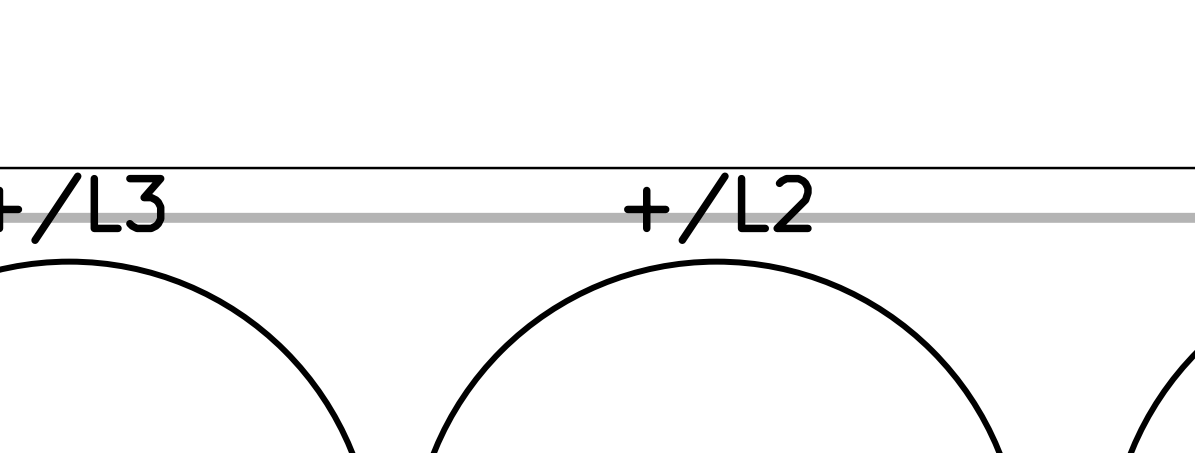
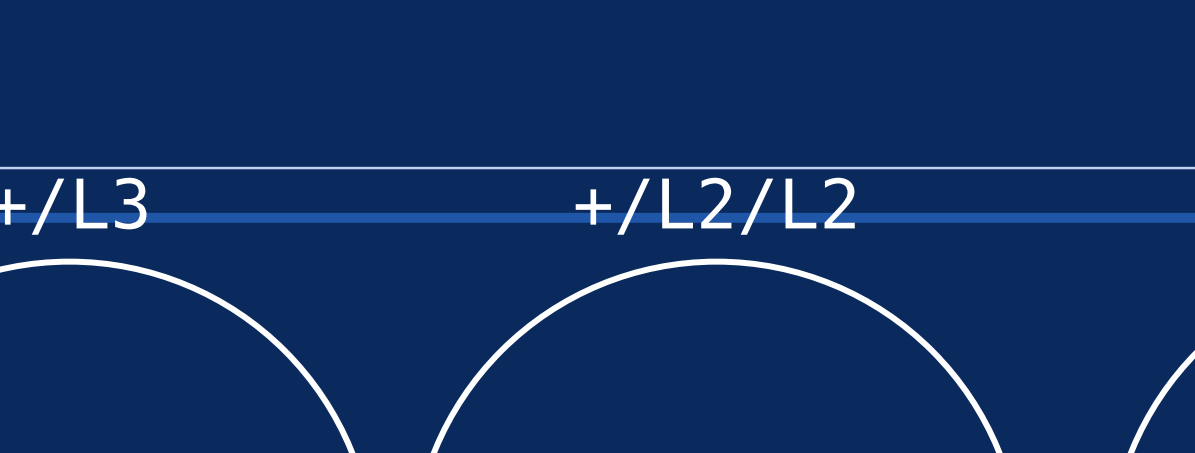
+/L2 name: +/L2 (717, 208) -> +/L2/L2 (715, 206)

